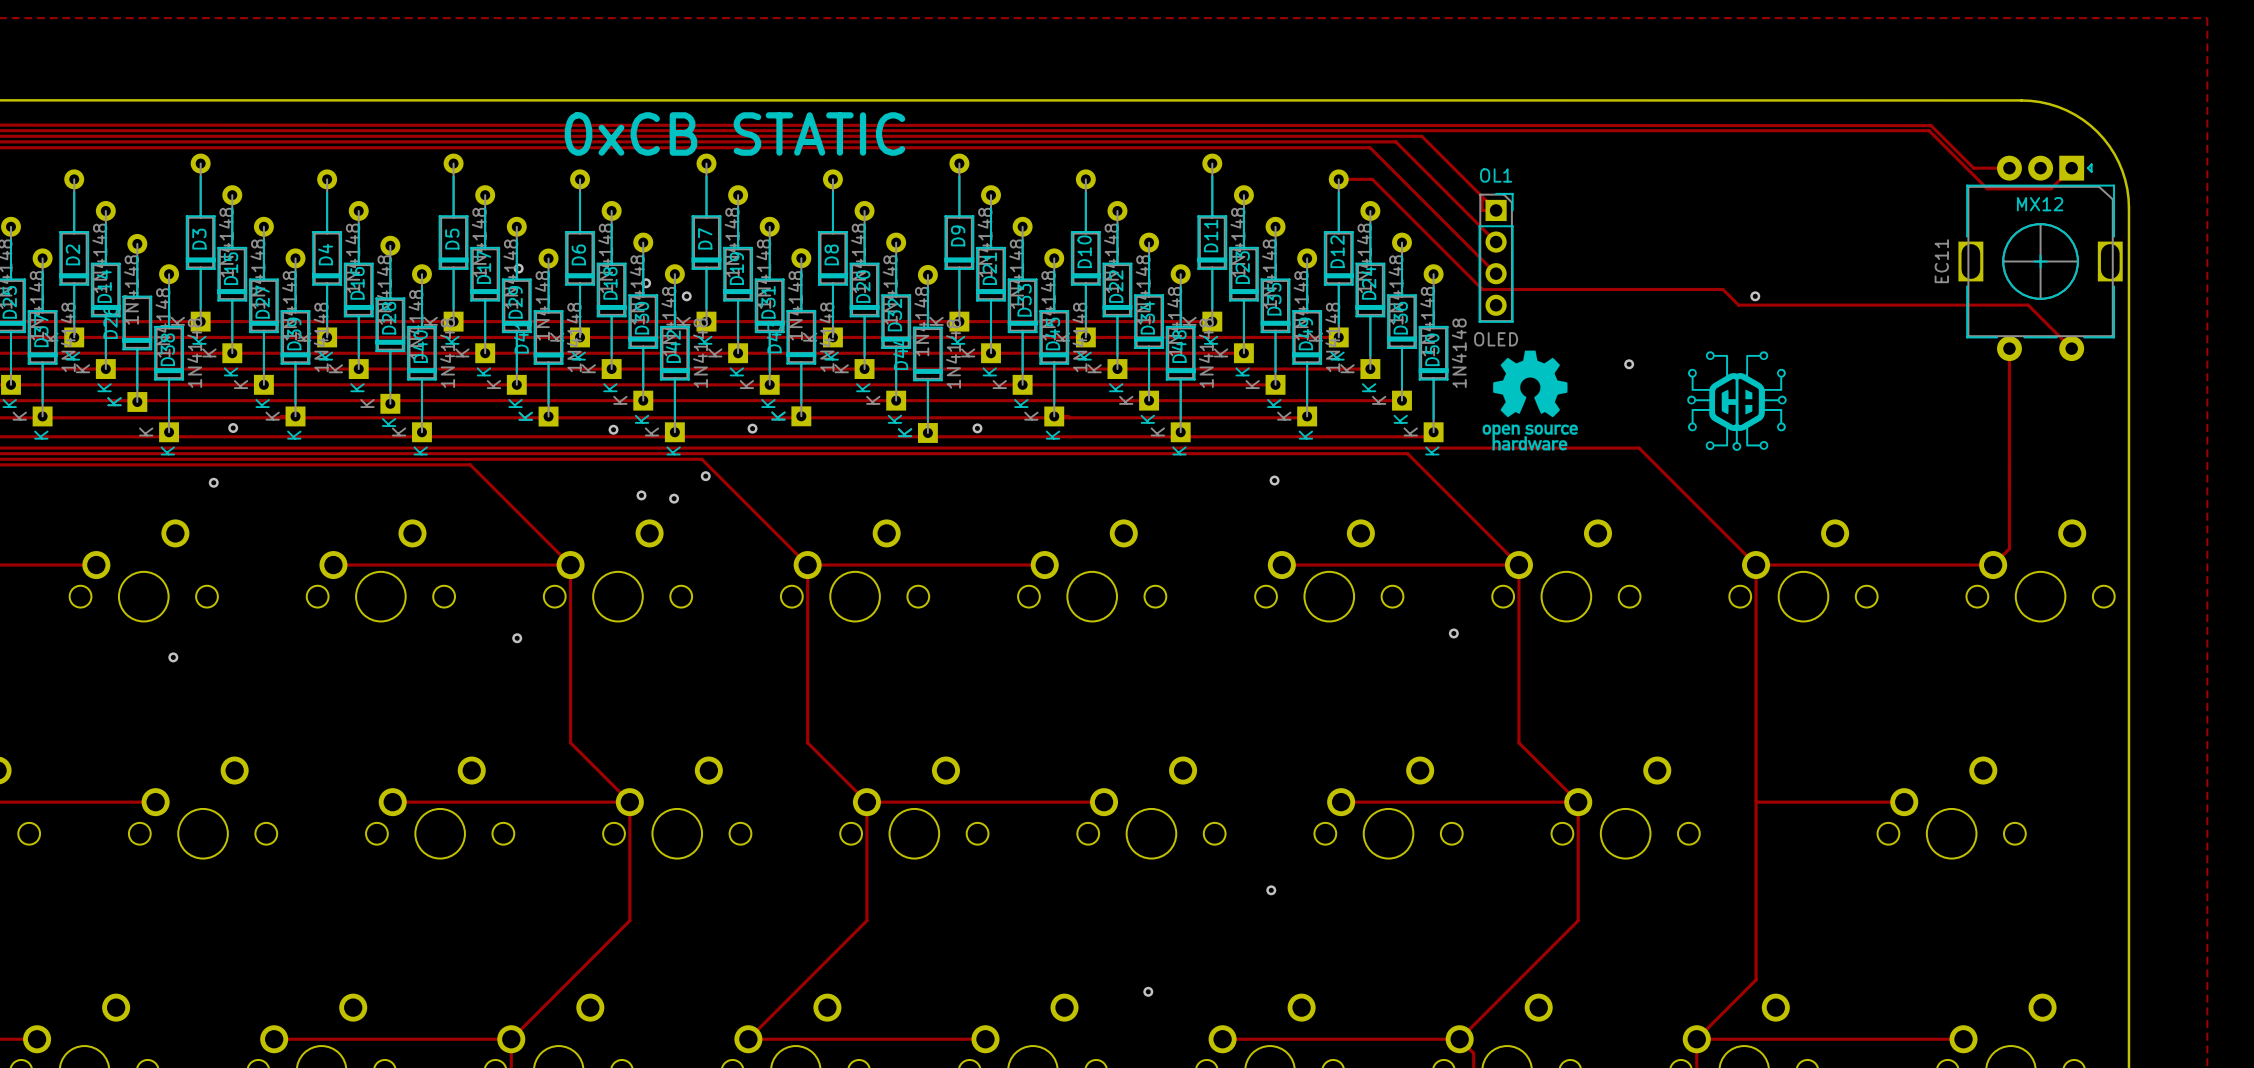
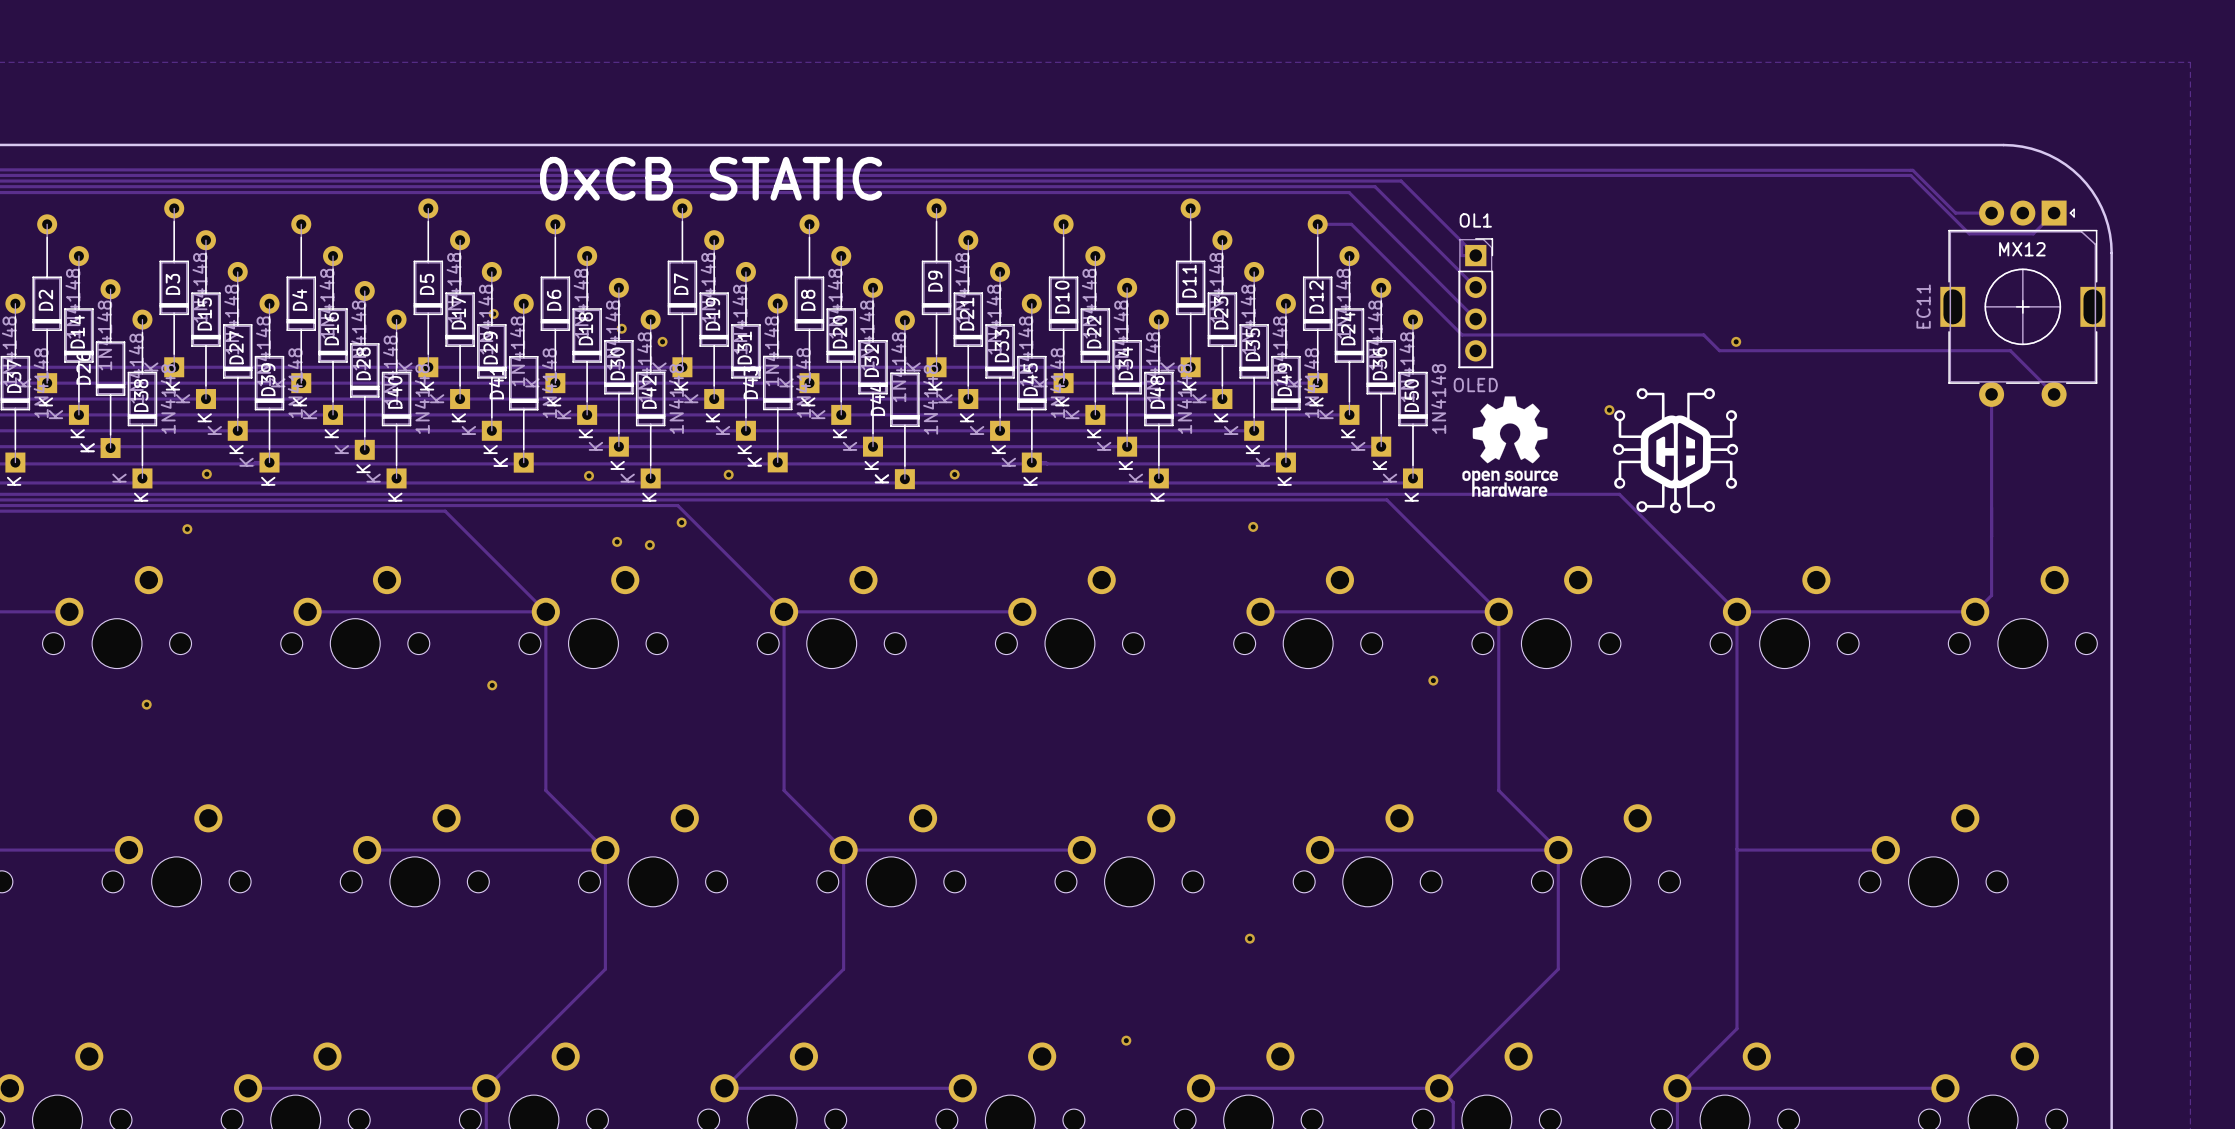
drawing: none -> [1613, 388, 1739, 514]
drawing: [1687, 351, 1787, 451] -> none

